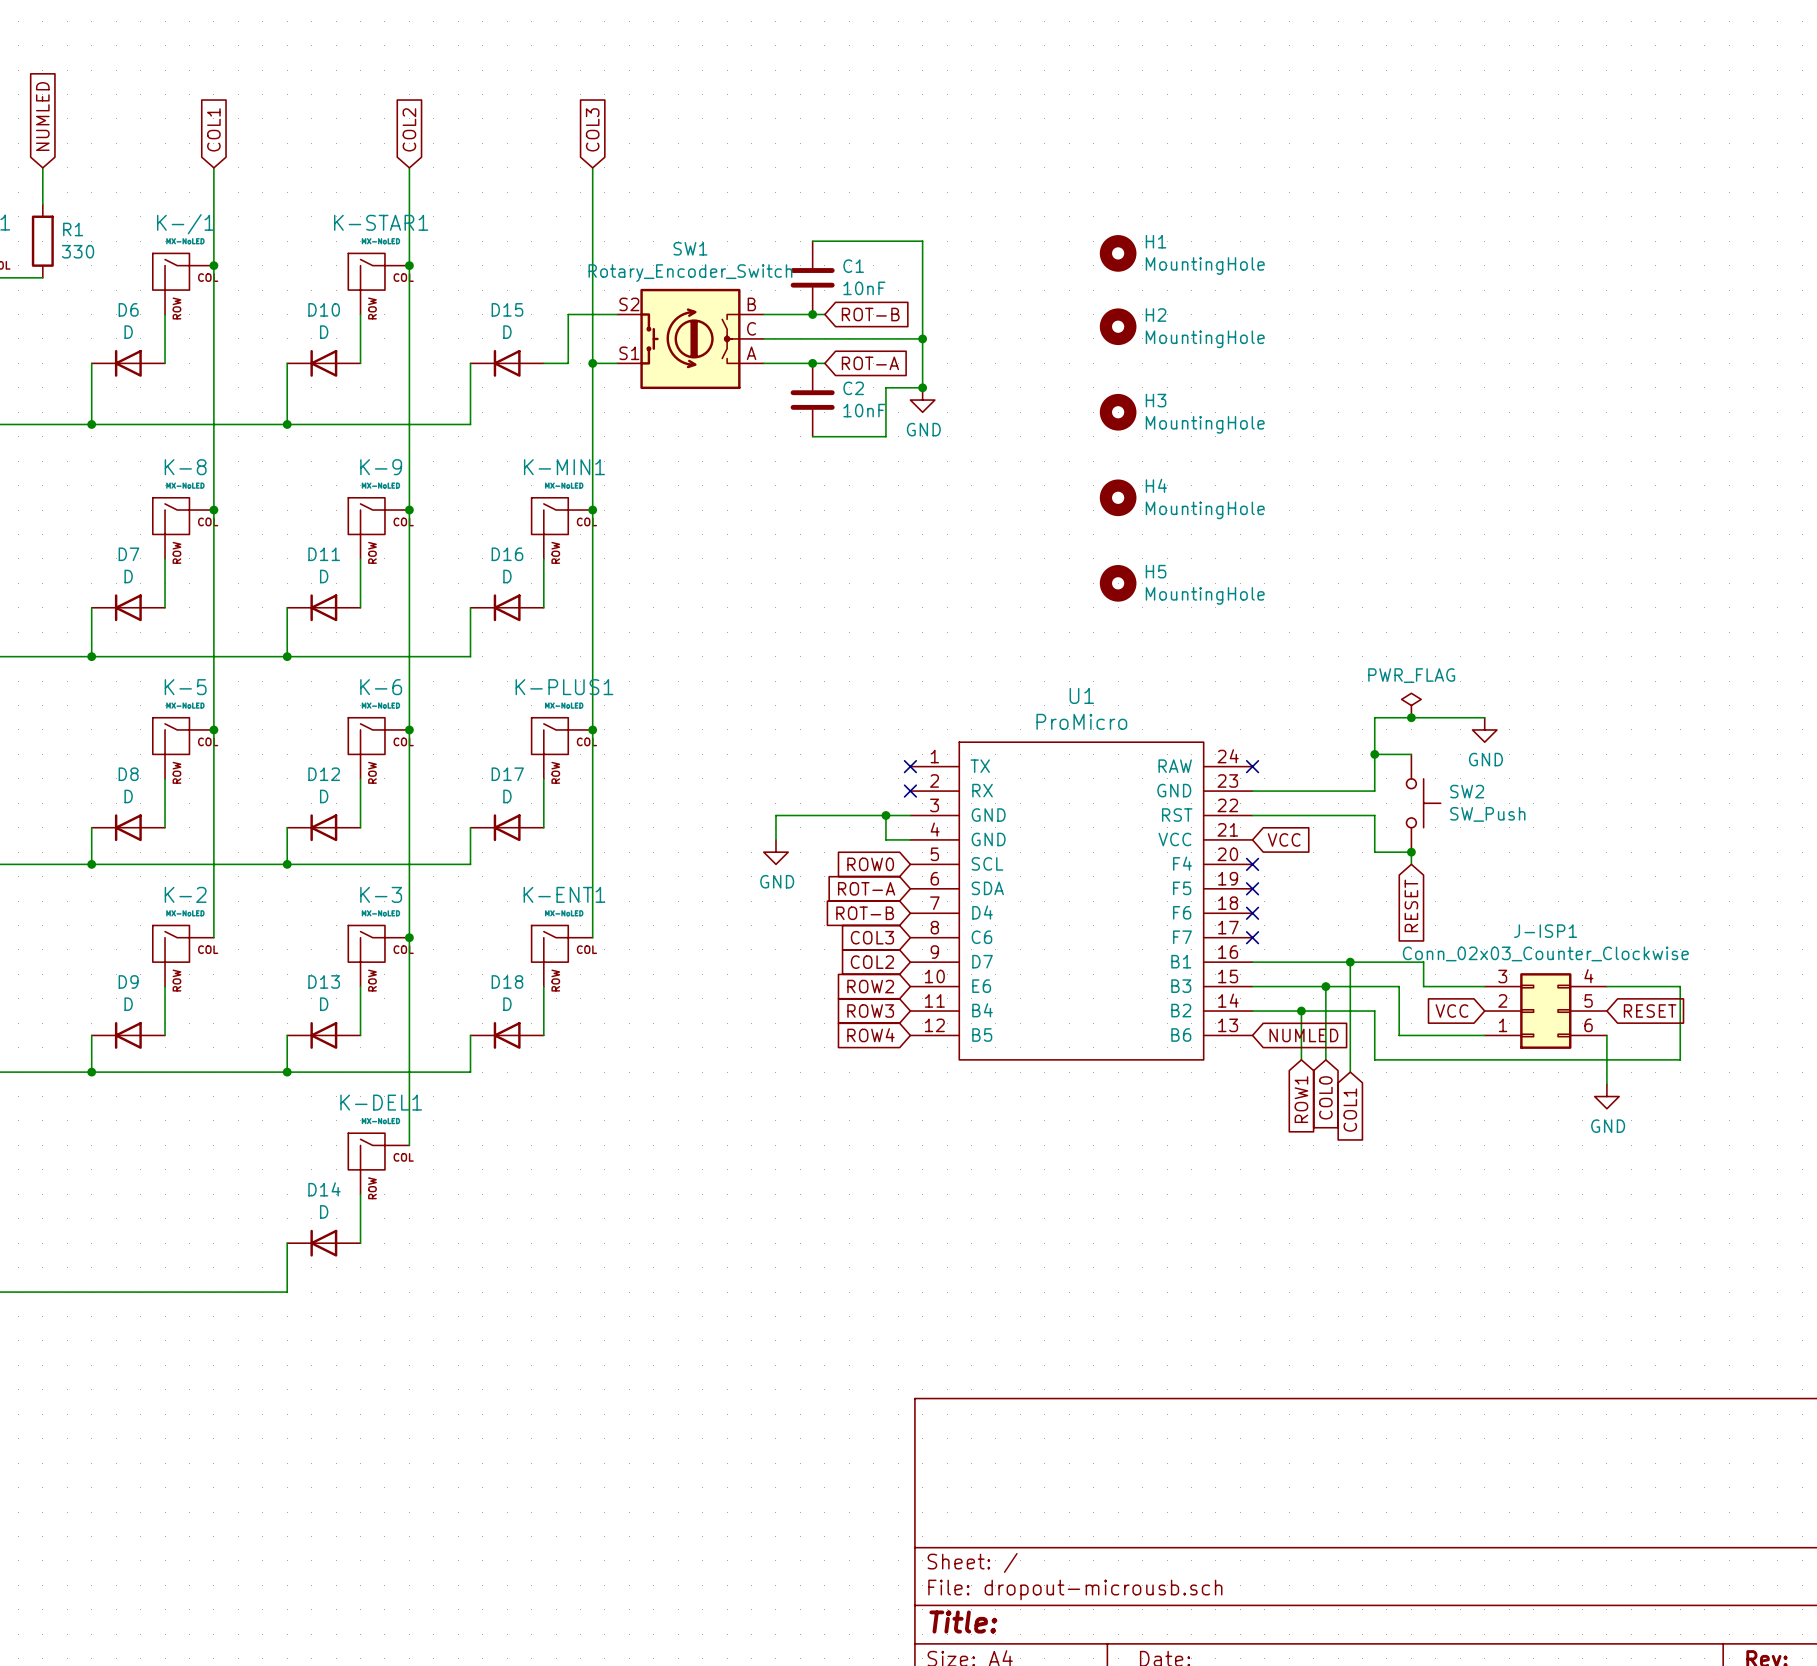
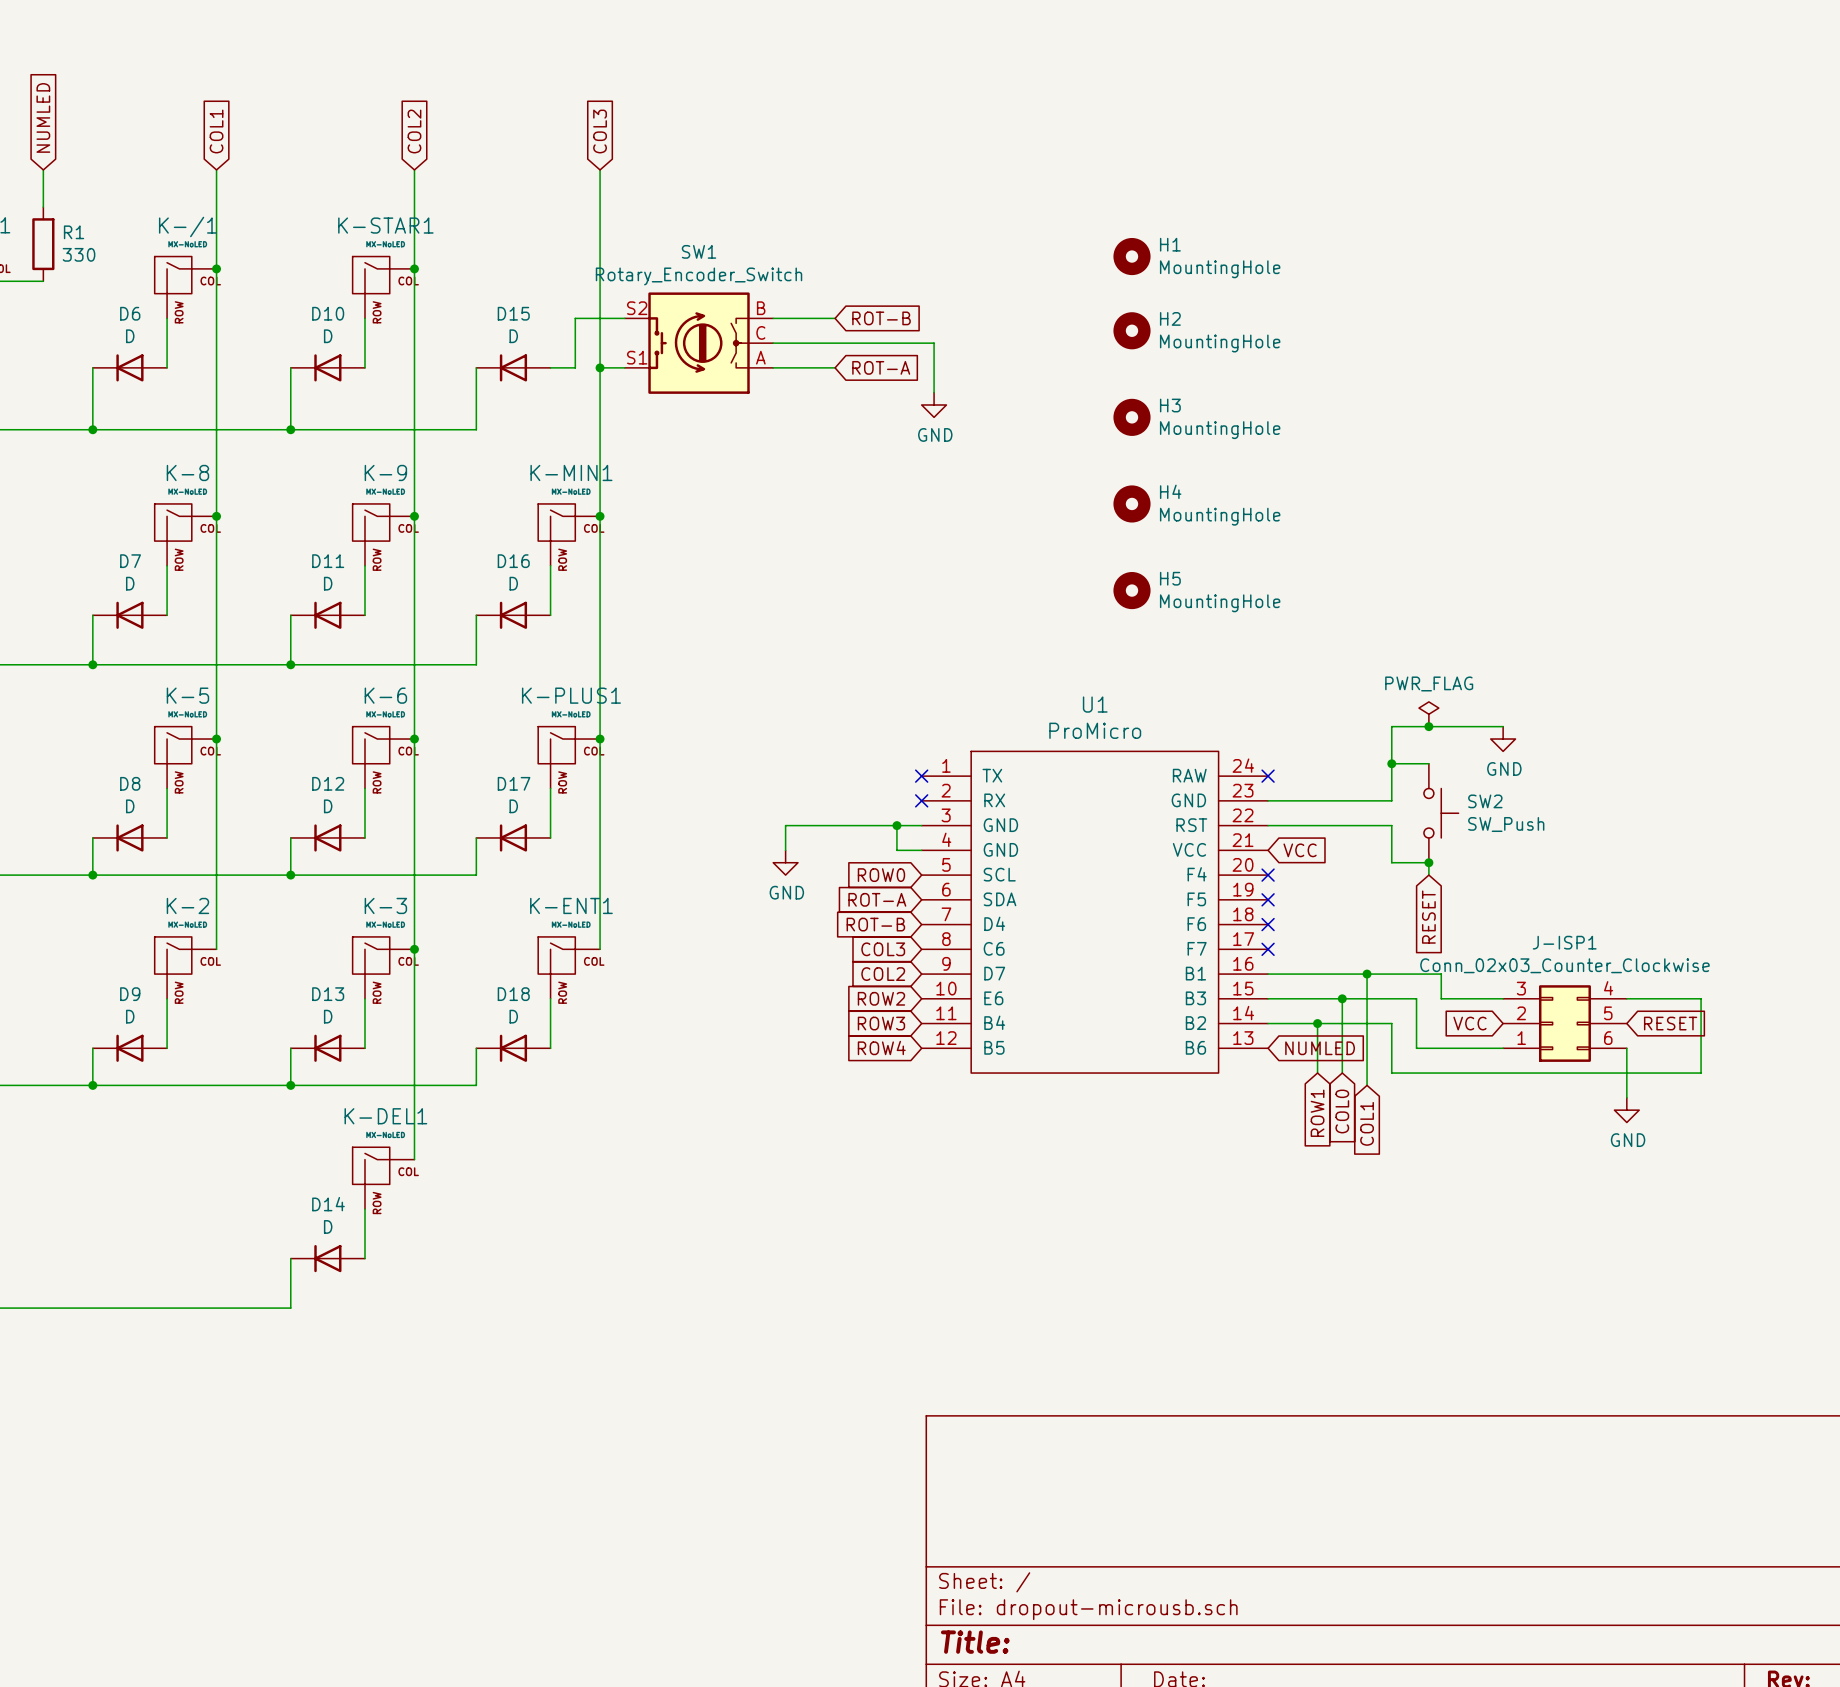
wire: (812, 241) (922, 241) (922, 338) -> none
C1: 10nF (812, 277) -> none
junction: (812, 314) -> none
junction: (922, 338) -> none
junction: (812, 363) -> none
wire: (922, 387) (885, 387) (885, 436) (812, 436) -> none
junction: (922, 387) -> none
C2: 10nF (812, 400) -> none

